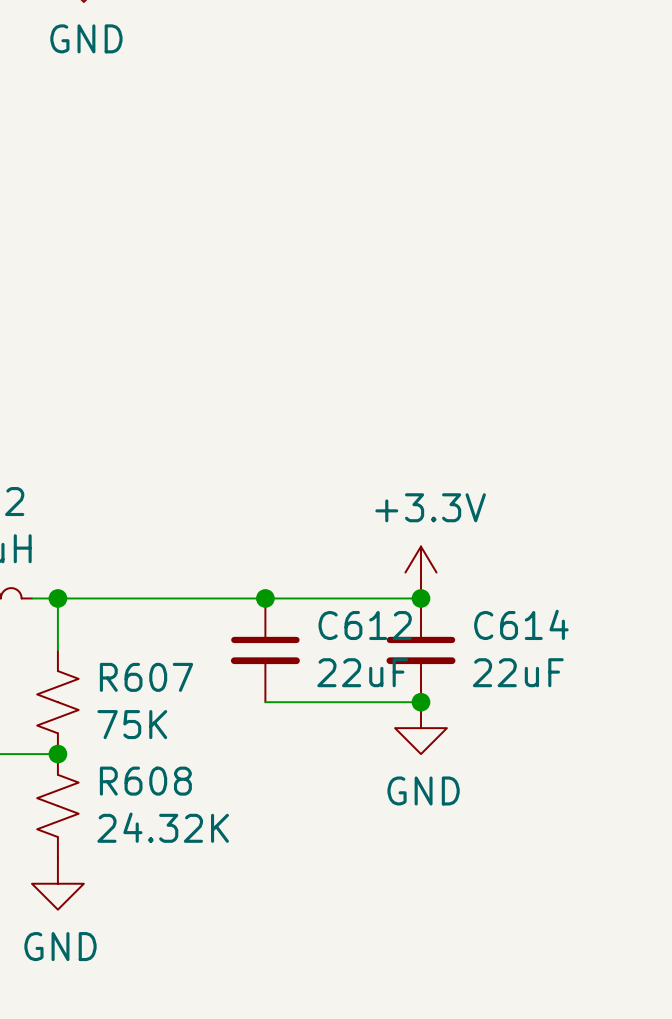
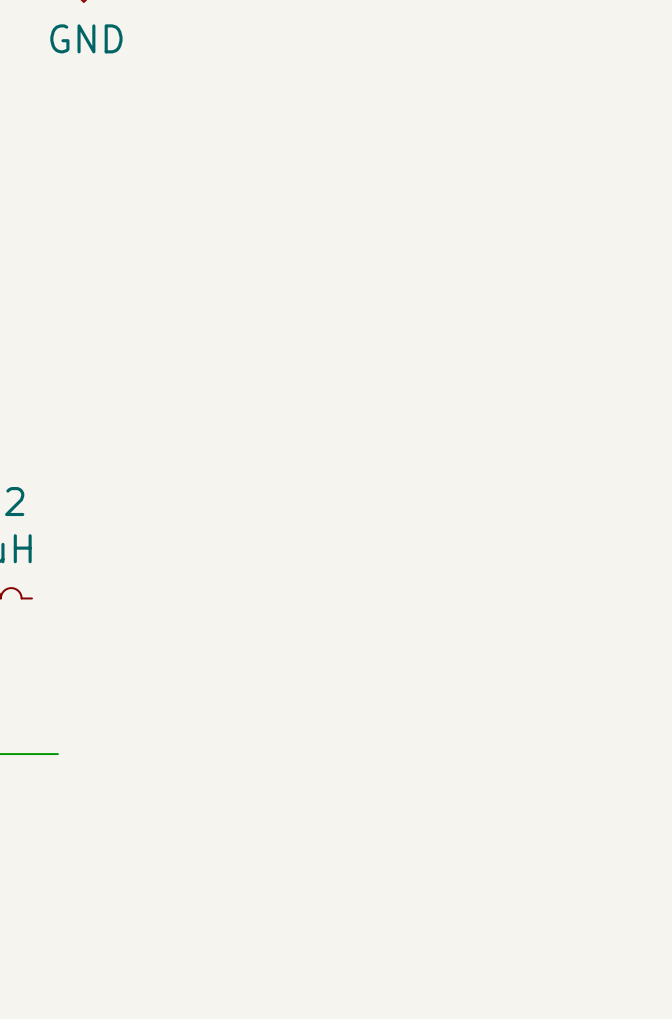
power symbol: +3.3V (420, 572) -> none
wire: (31, 598) (420, 598) -> none
wire: (57, 598) (57, 650) -> none
junction: (57, 598) -> none
junction: (265, 598) -> none
junction: (420, 598) -> none
C612: 22uF (265, 650) -> none
C614: 22uF (420, 650) -> none
R607: 75K (57, 702) -> none
wire: (265, 702) (420, 702) -> none
junction: (420, 702) -> none
power symbol: GND (420, 728) -> none
junction: (57, 754) -> none
R608: 24.32K (57, 805) -> none
power symbol: GND (57, 883) -> none

